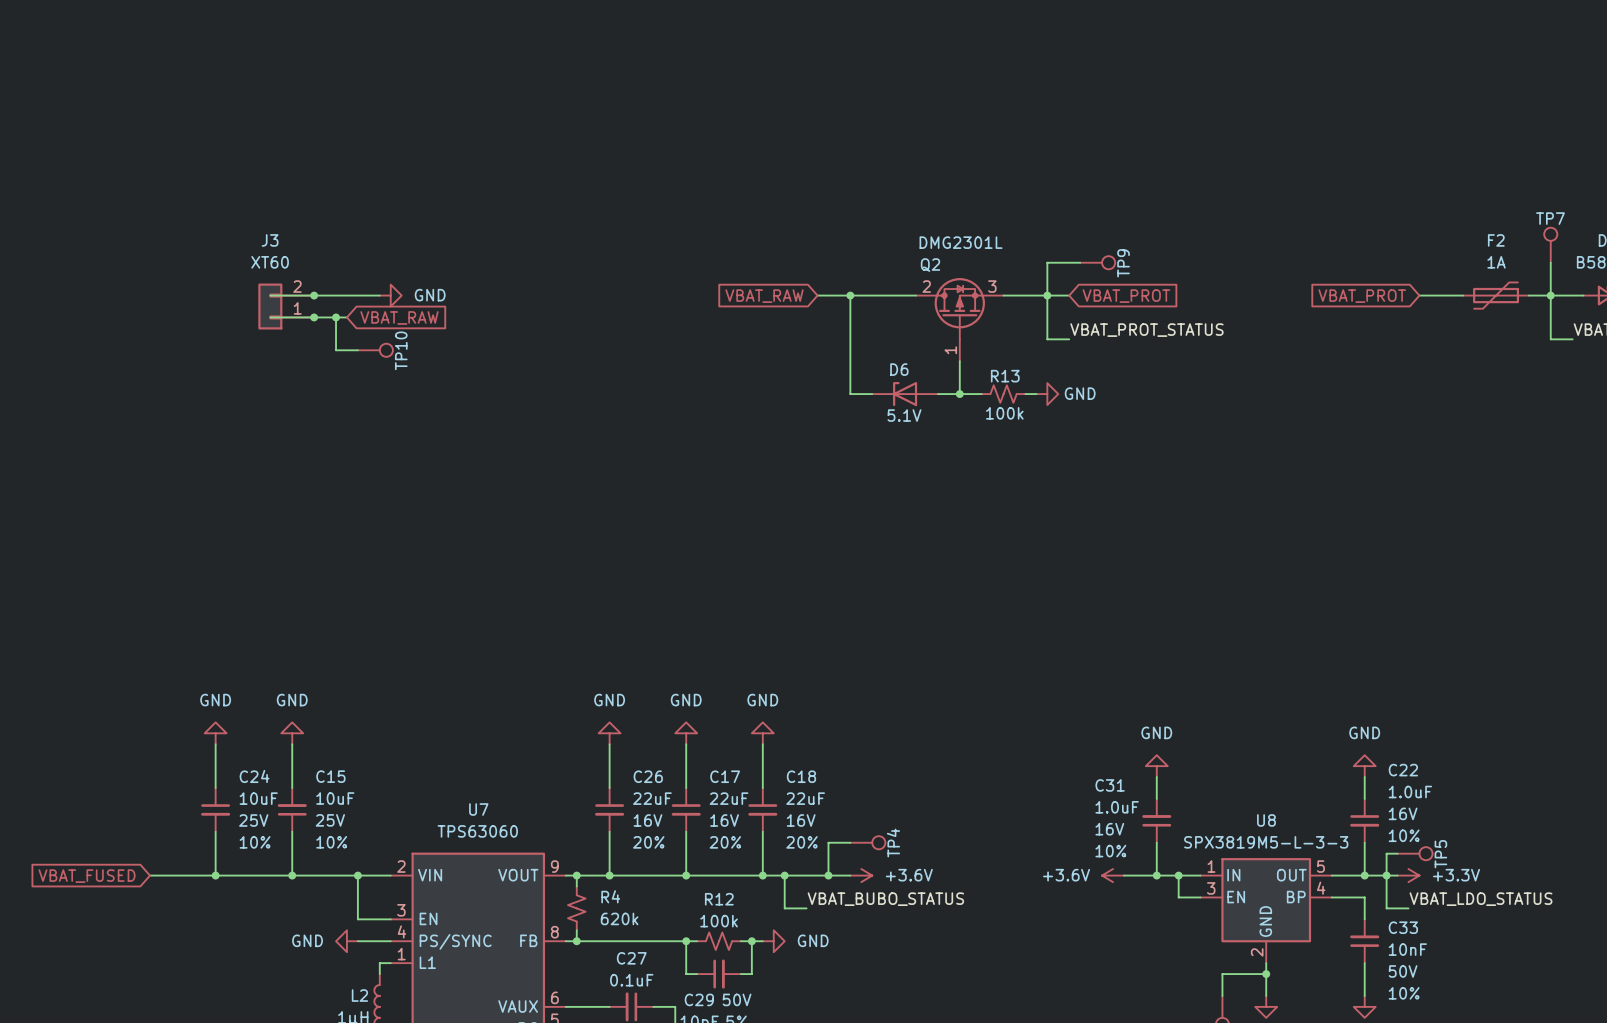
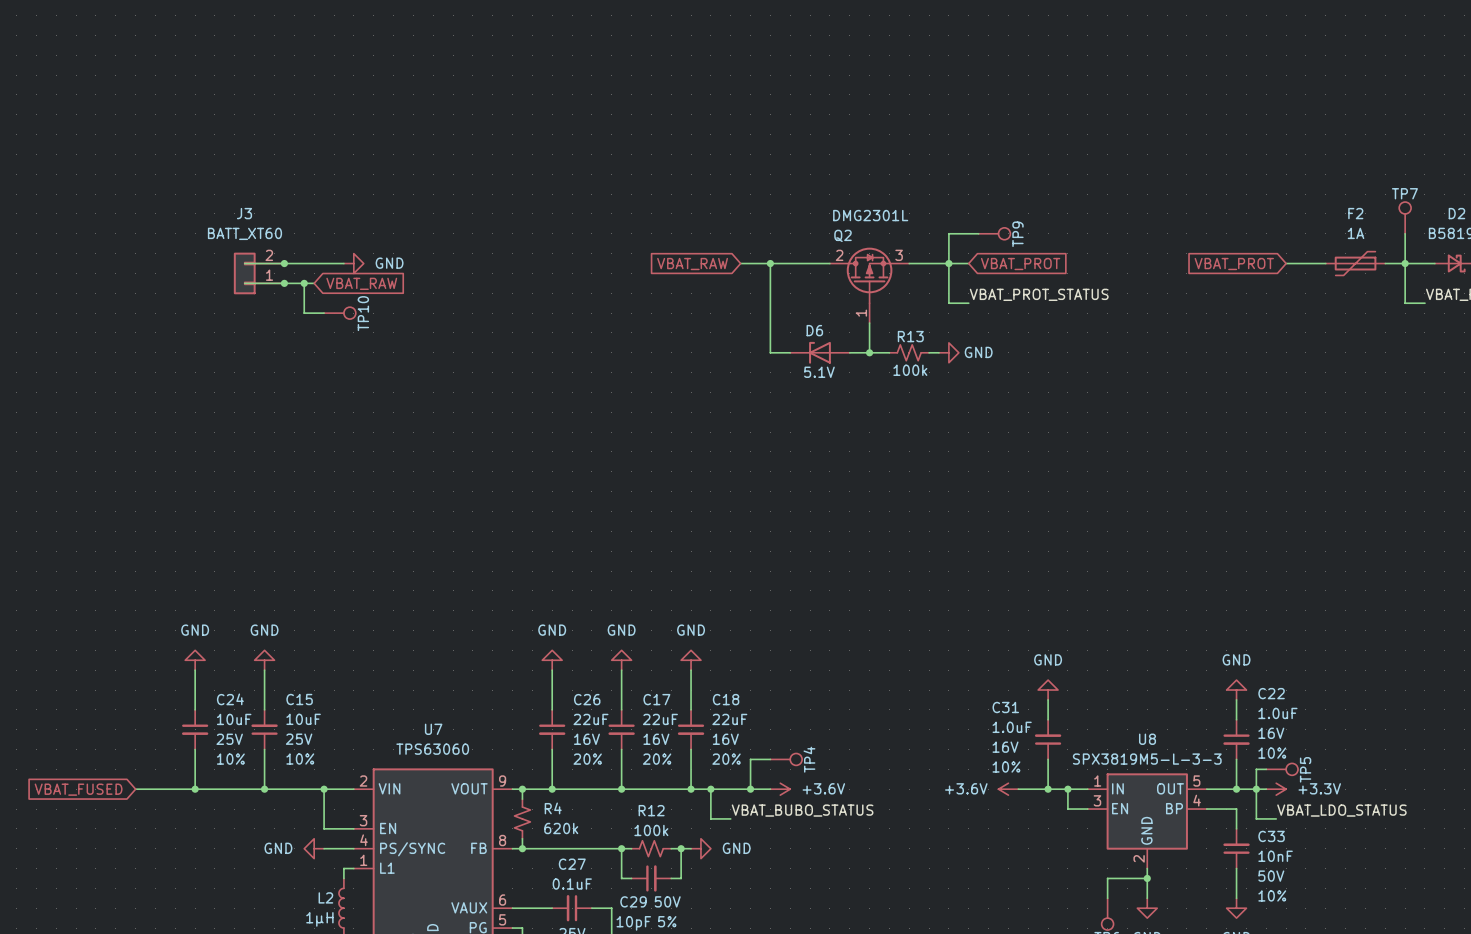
J3 value: XT60 (270, 262) -> BATT_XT60 (244, 233)

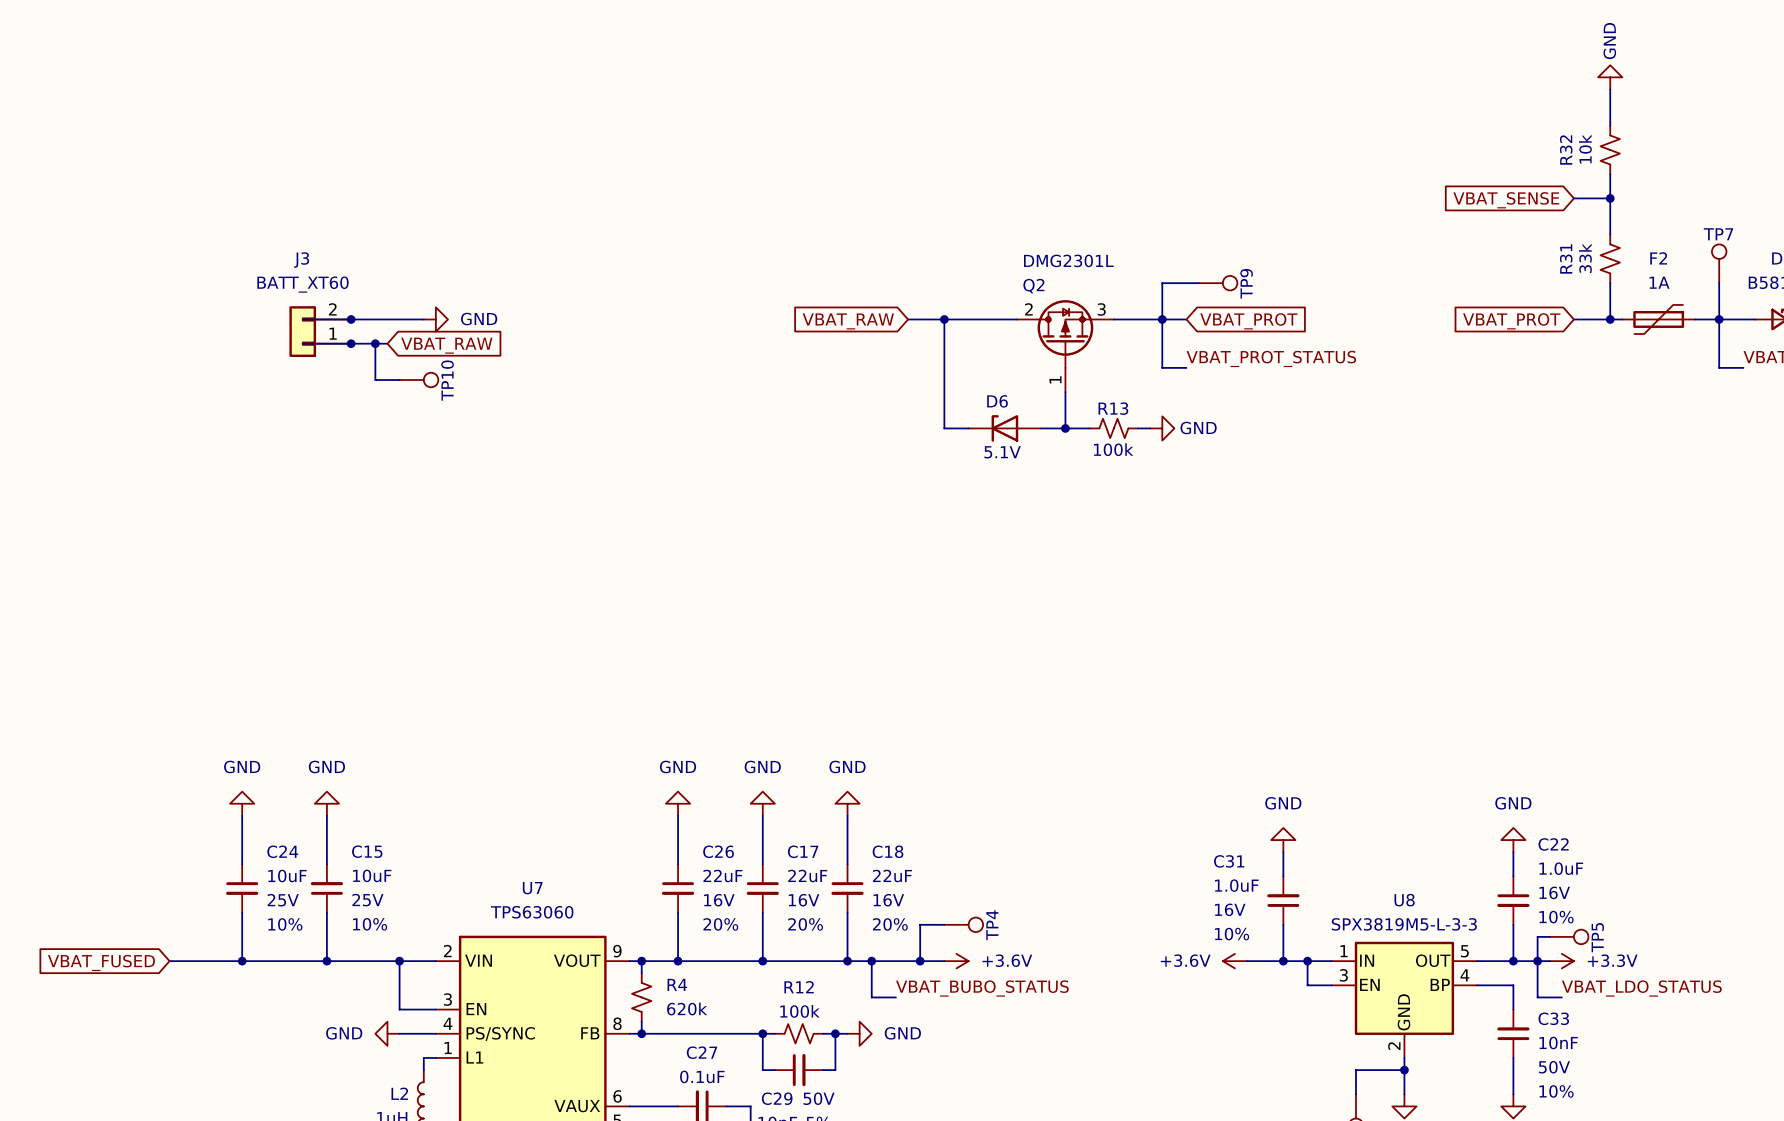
power symbol: none -> GND (1610, 77)
wire: none -> (1610, 89) (1610, 125)
R32: none -> 10k (1610, 149)
wire: none -> (1610, 174) (1610, 234)
global label: none -> VBAT_SENSE (1506, 200)
wire: none -> (1573, 198) (1610, 198)
junction: none -> (1610, 198)
R31: none -> 33k (1610, 258)
wire: none -> (1610, 283) (1610, 319)
junction: none -> (1610, 319)

